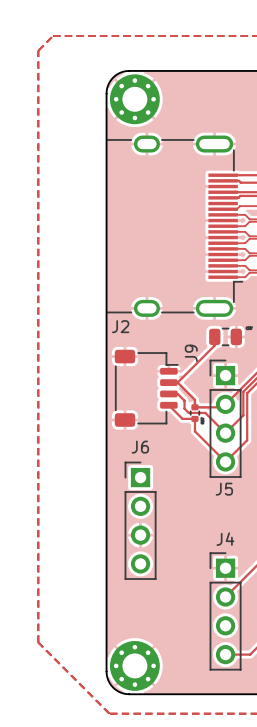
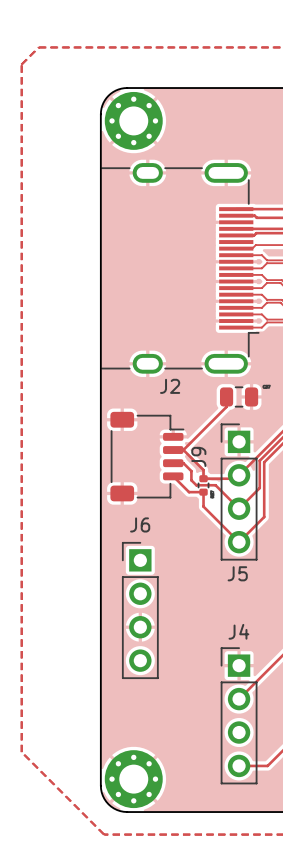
J2 name position: J2 (120, 326) -> J2 (170, 386)
J9 name position: J9 (191, 353) -> J9 (198, 456)

